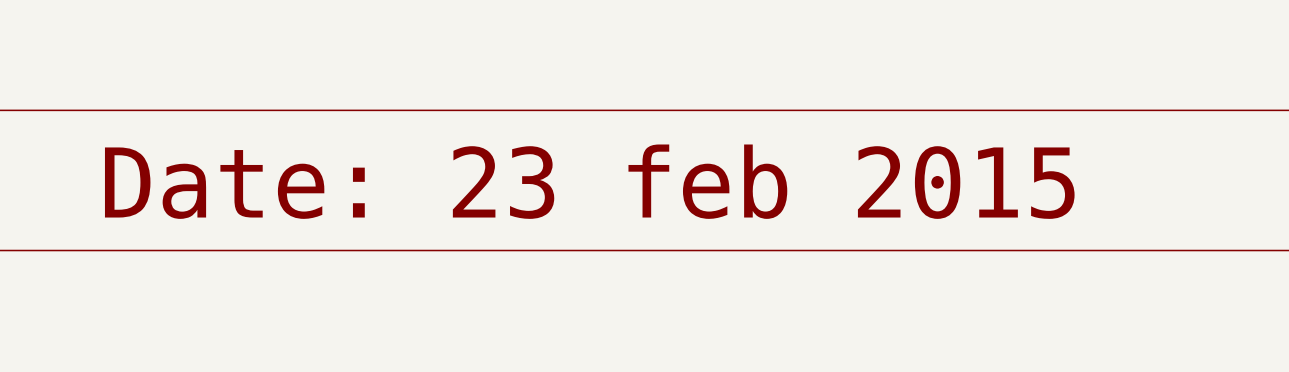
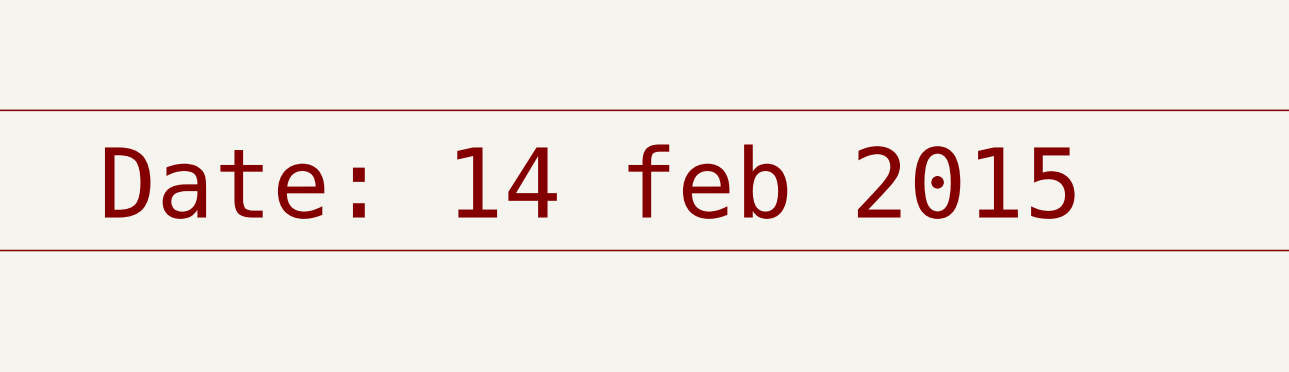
title block: Date: 23 feb 2015 (589, 181) -> Date: 14 feb 2015 (589, 181)

